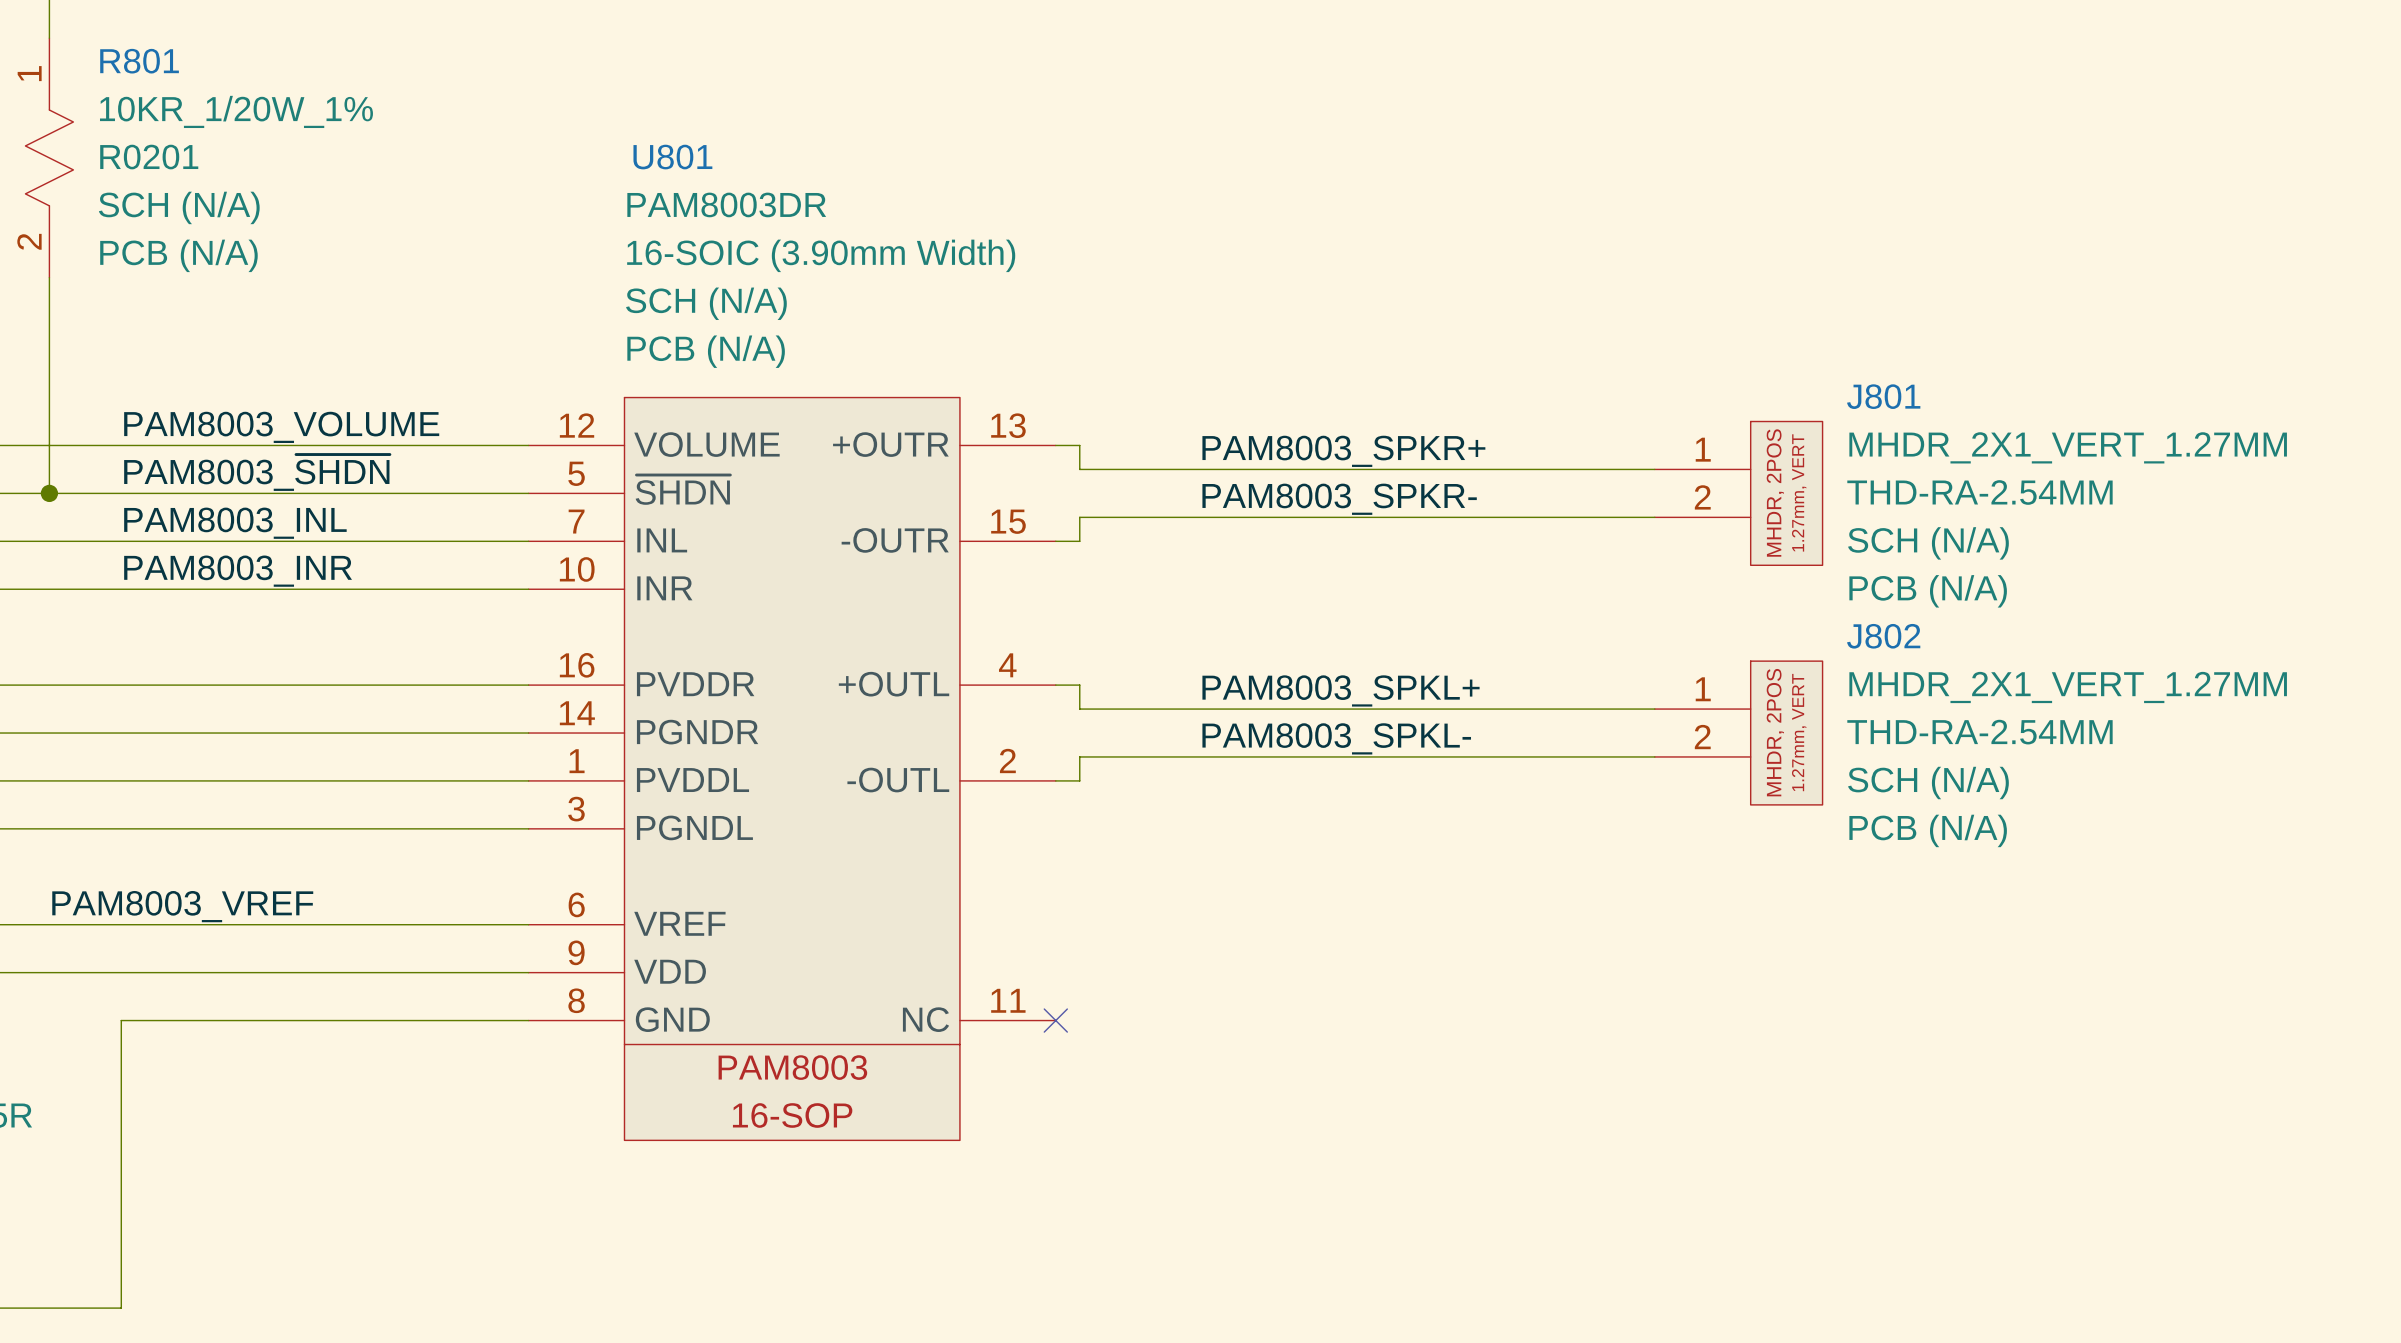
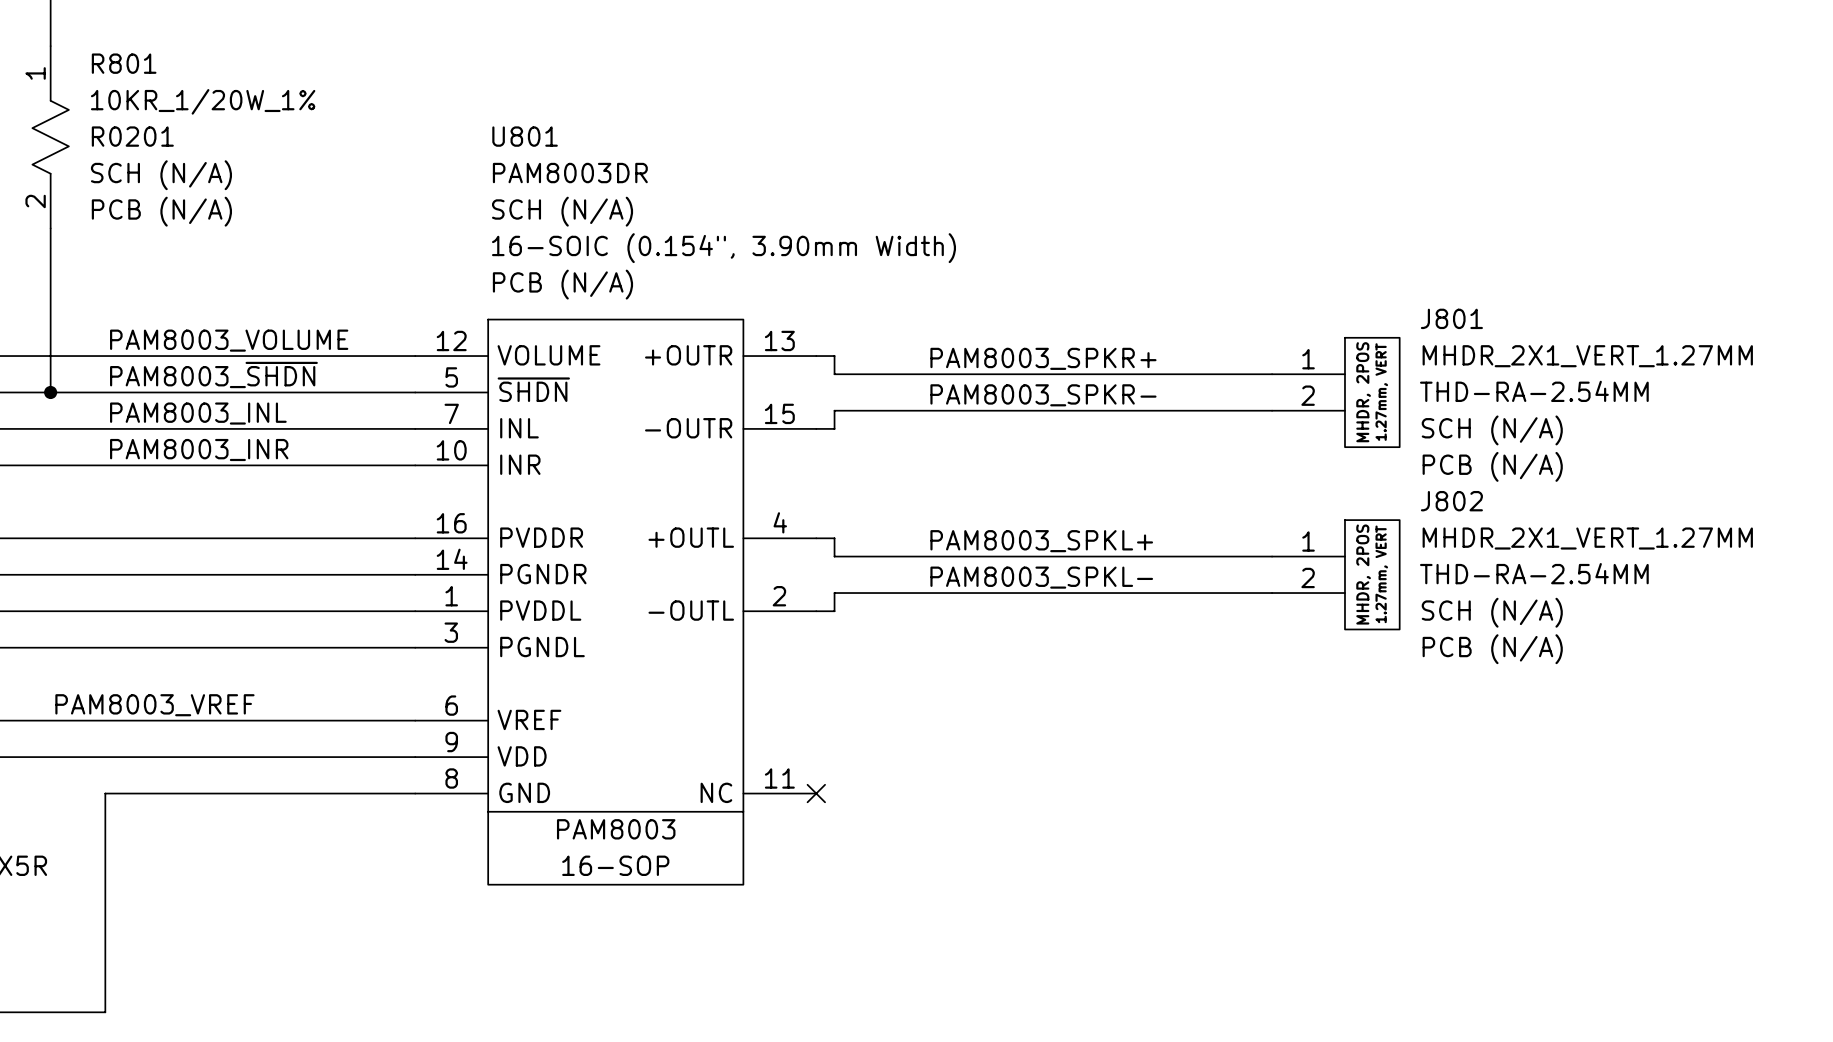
U801 text: 16-SOIC (3.90mm Width) (821, 255) -> 16-SOIC (0.154", 3.90mm Width) (723, 248)
U801 text position: SCH (N/A) (706, 303) -> SCH (N/A) (562, 211)

